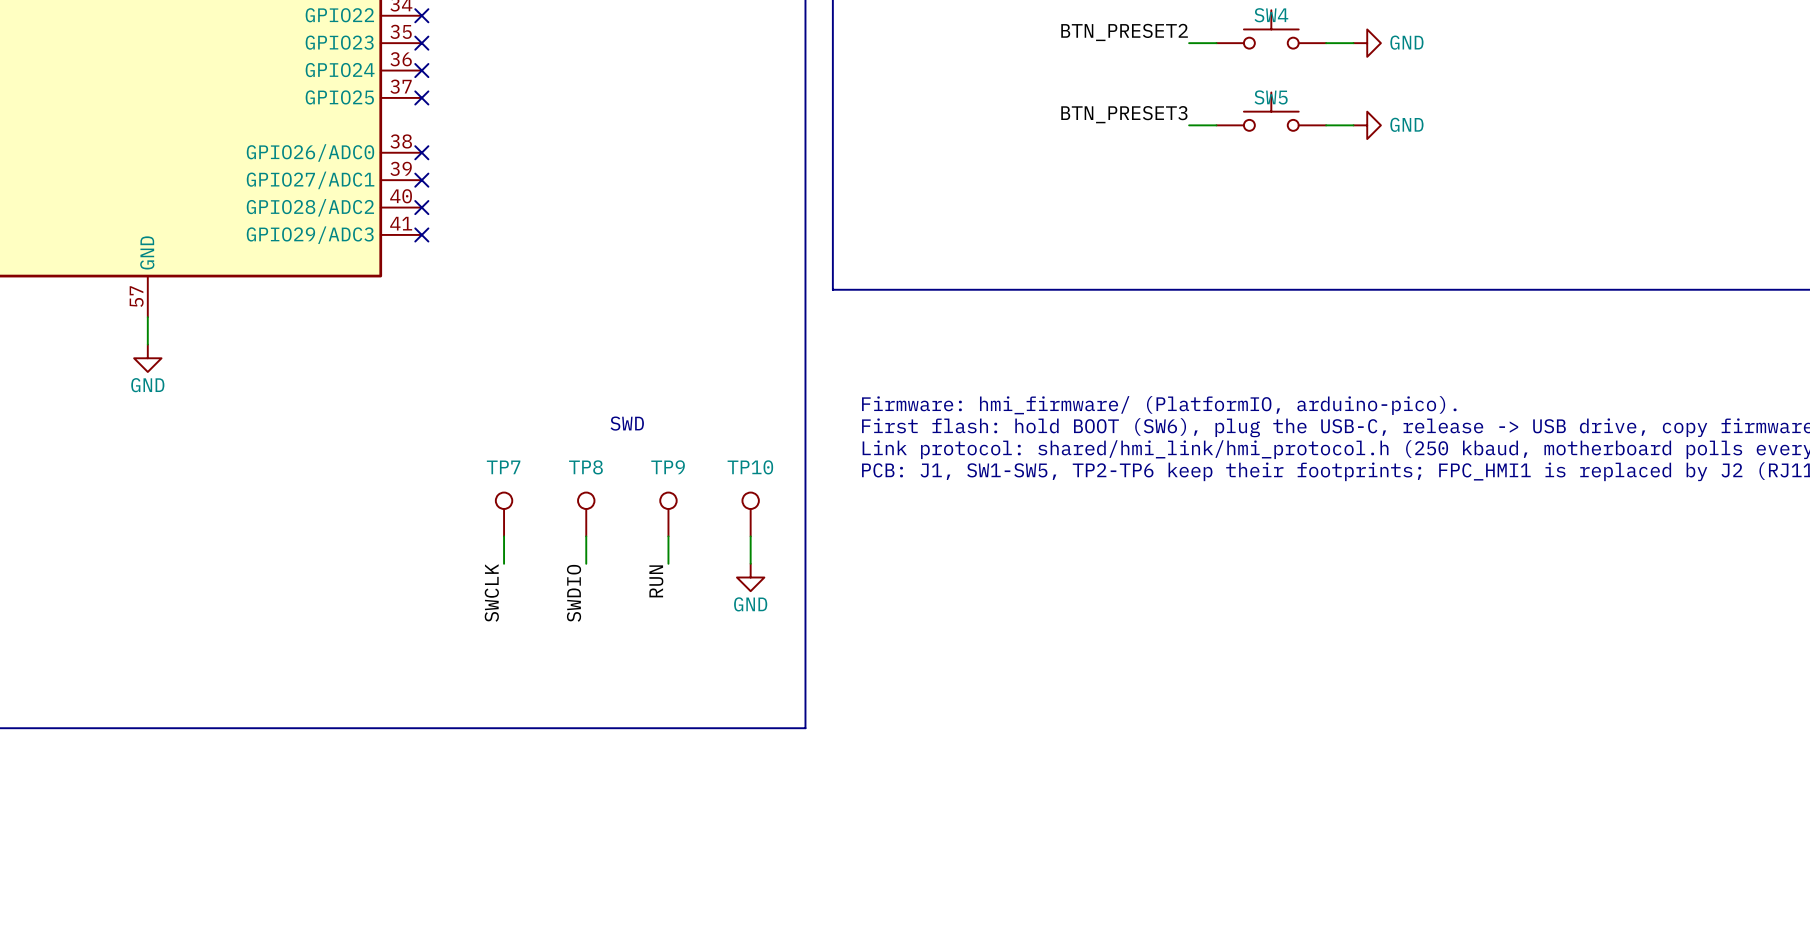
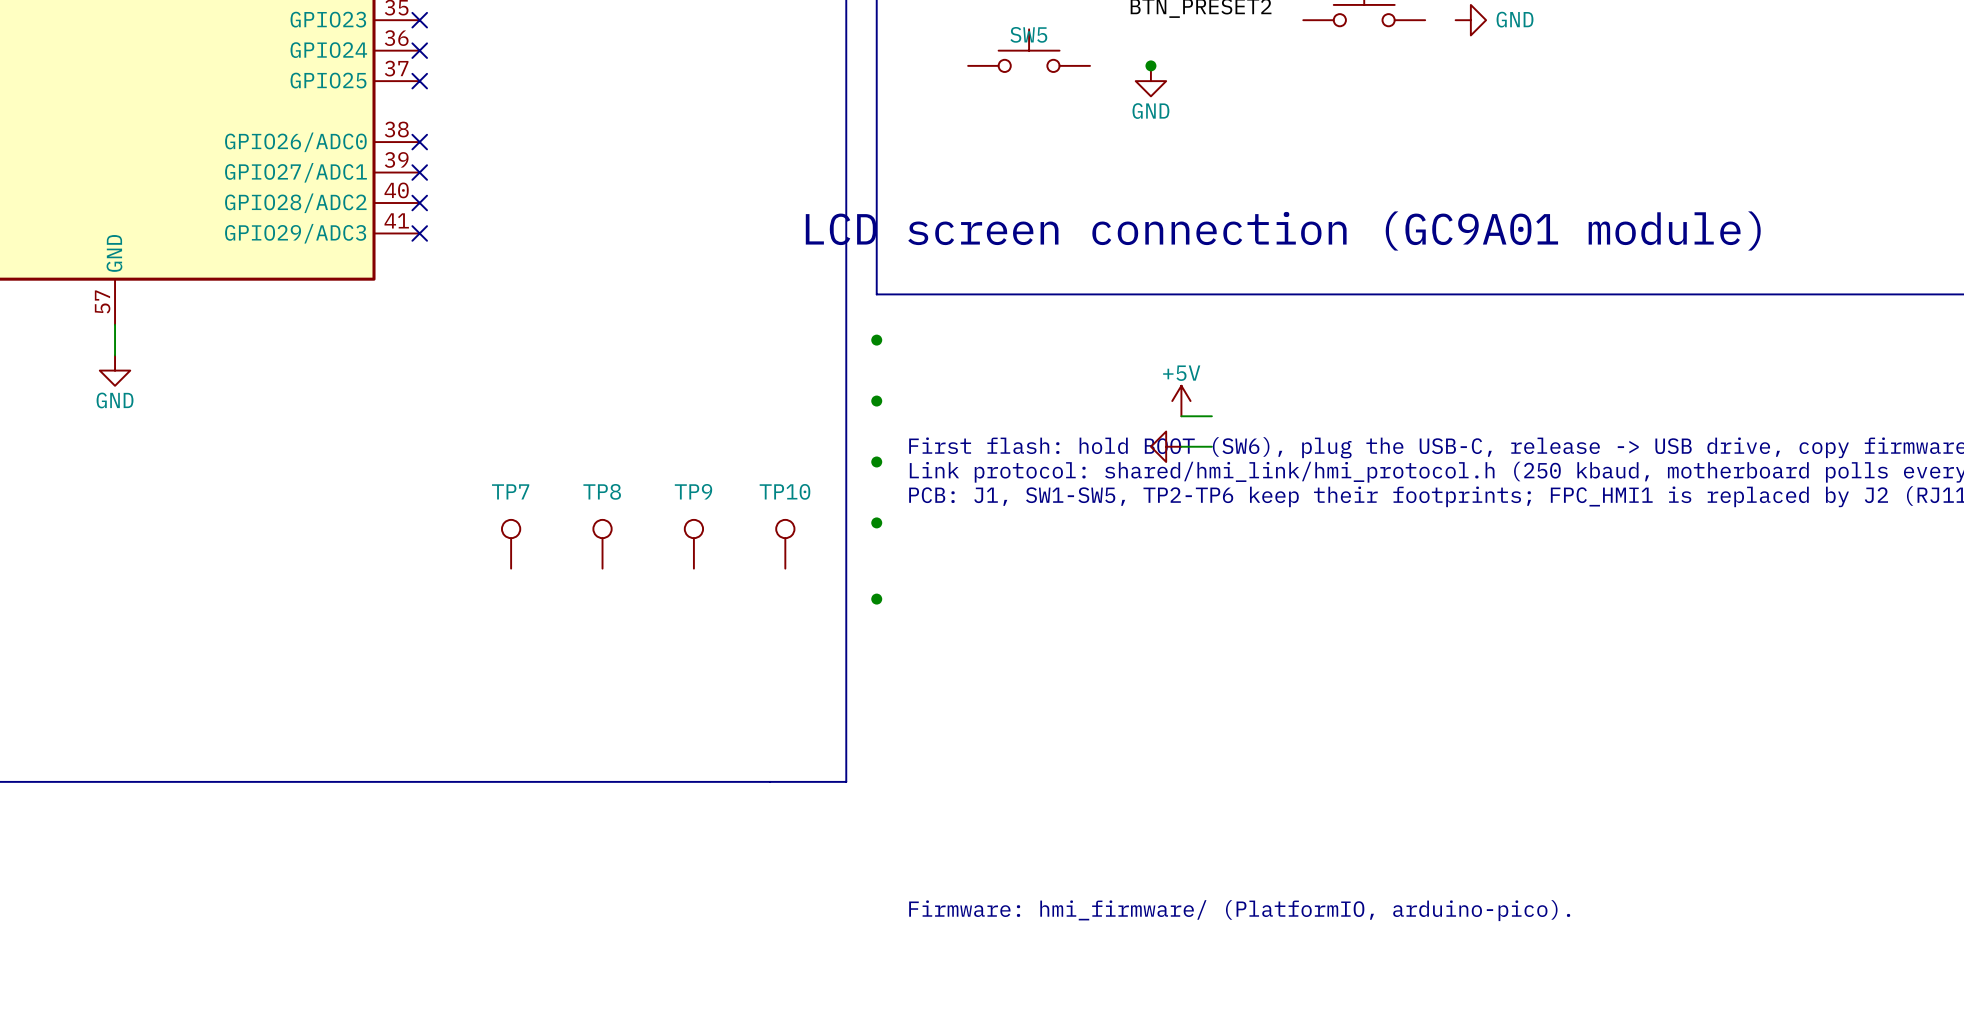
wire: (1189, 43) (1216, 43) -> none
wire: (1326, 43) (1353, 43) -> none
junction: none -> (1150, 65)
power symbol: none -> GND (1150, 81)
SW5 position: (1271, 111) -> (1029, 50)
label: BTN_PRESET3 (1124, 114) -> none
wire: (1189, 125) (1216, 125) -> none
wire: (1326, 125) (1353, 125) -> none
power symbol: GND (1367, 125) -> none
text: none -> LCD screen connection (GC9A01 module) (1283, 230)
junction: none -> (876, 340)
junction: none -> (876, 401)
power symbol: none -> +5V (1181, 401)
wire: none -> (1181, 416) (1211, 416)
text: Firmware: hmi_firmware/ (PlatformIO, arduino-pico). (1159, 405) -> none
text: SWD (627, 423) -> none
power symbol: none -> (1166, 446)
wire: none -> (1181, 446) (1211, 446)
junction: none -> (876, 461)
junction: none -> (876, 522)
wire: (504, 536) (504, 563) -> none
wire: (586, 536) (586, 563) -> none
wire: (668, 536) (668, 563) -> none
wire: (750, 536) (750, 563) -> none
junction: none -> (876, 599)
power symbol: GND (750, 577) -> none
label: RUN (656, 581) -> none
label: SWCLK (491, 593) -> none
label: SWDIO (574, 593) -> none
text: none -> Firmware: hmi_firmware/ (PlatformIO, arduino-pico). (1239, 910)

